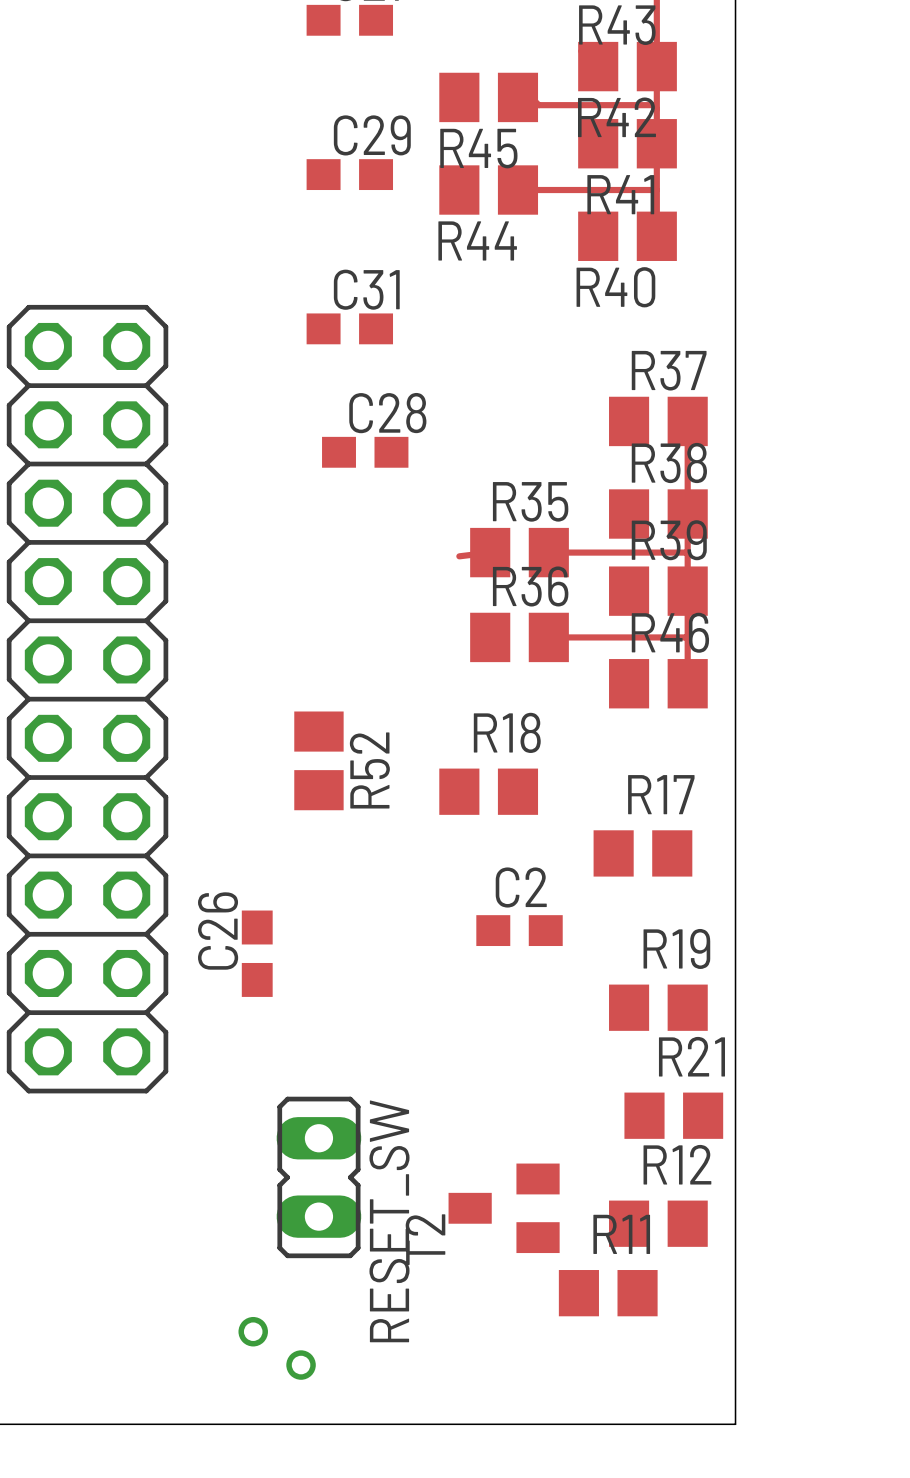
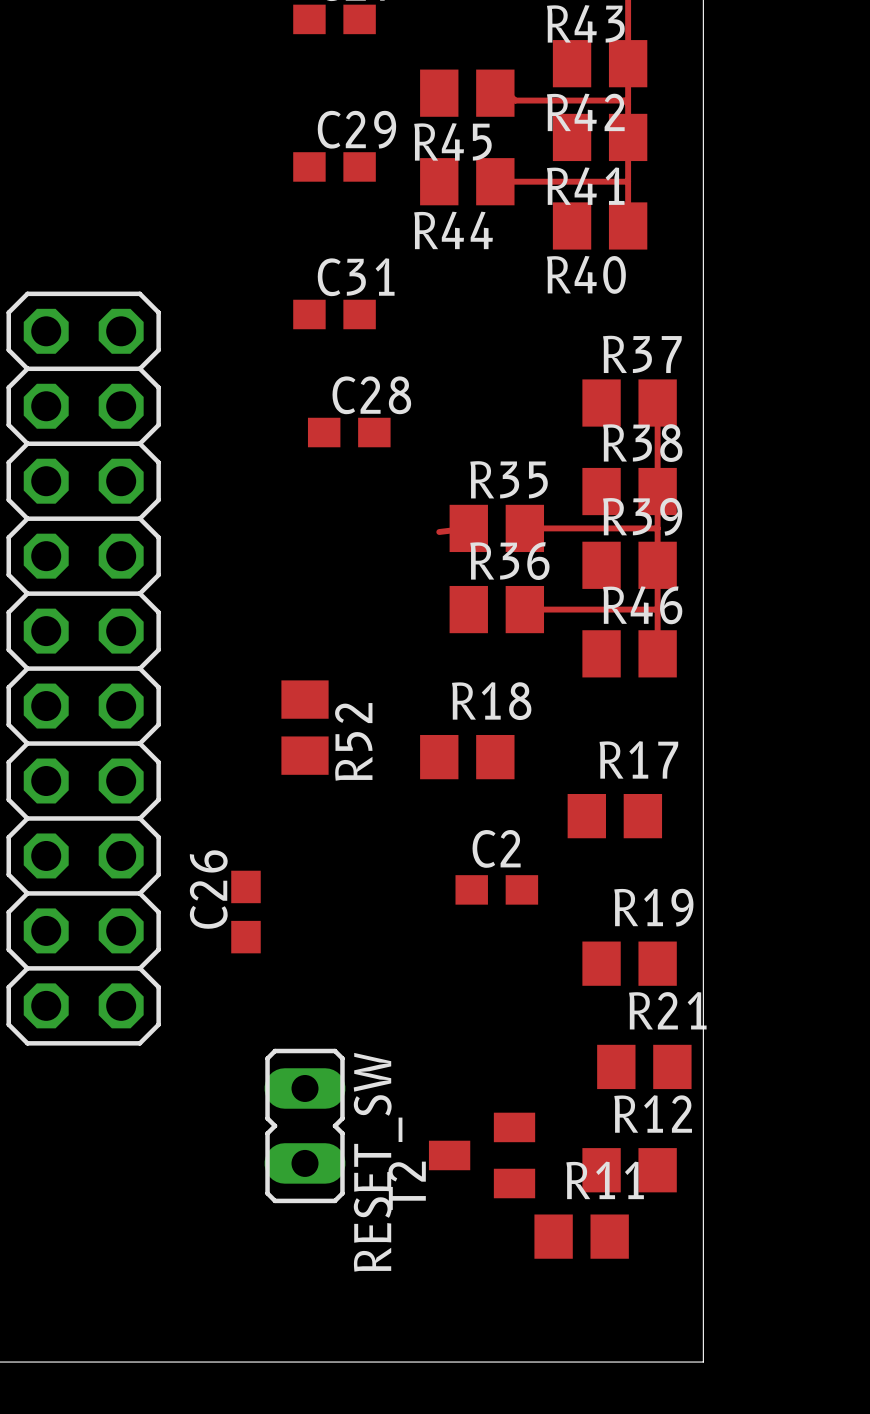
via: (253, 1331) -> none
via: (301, 1365) -> none

